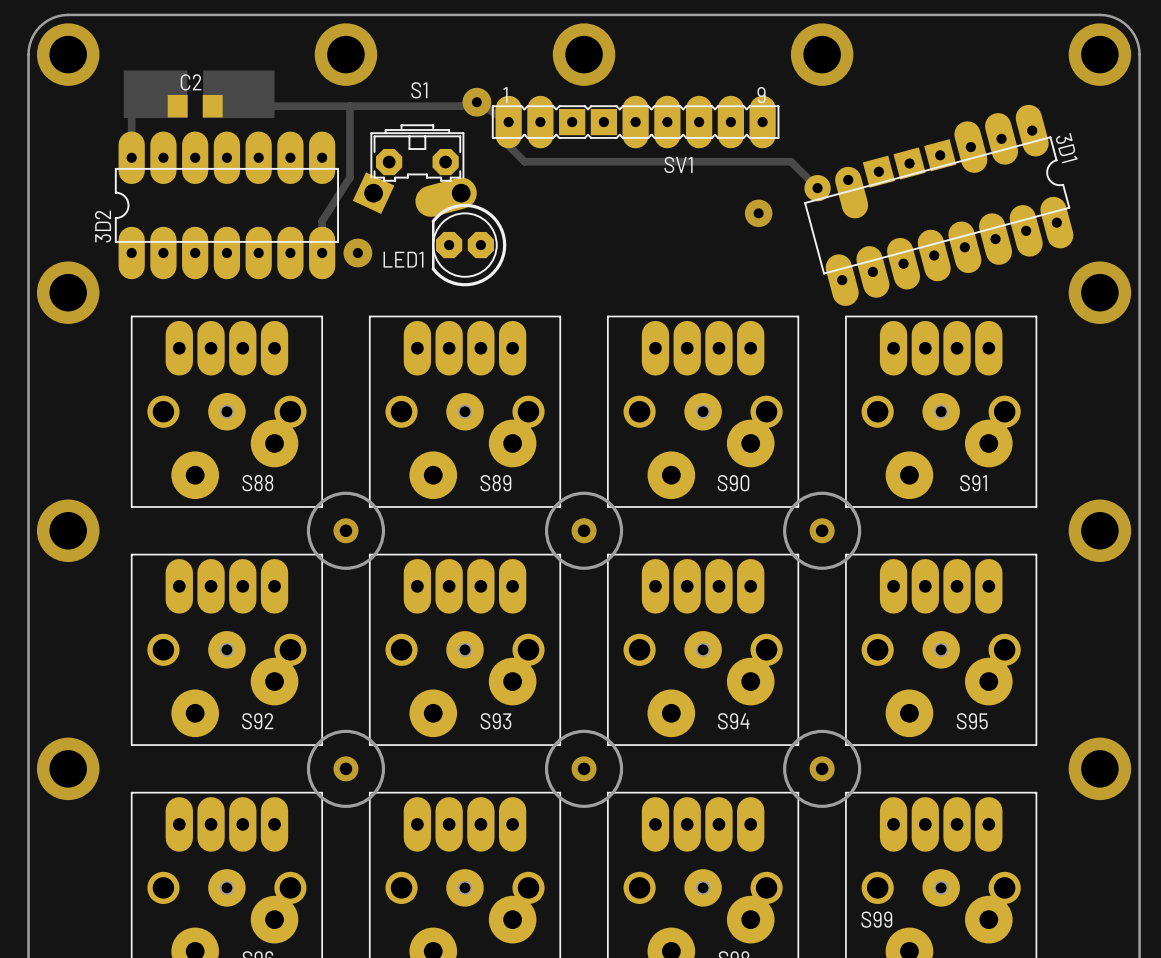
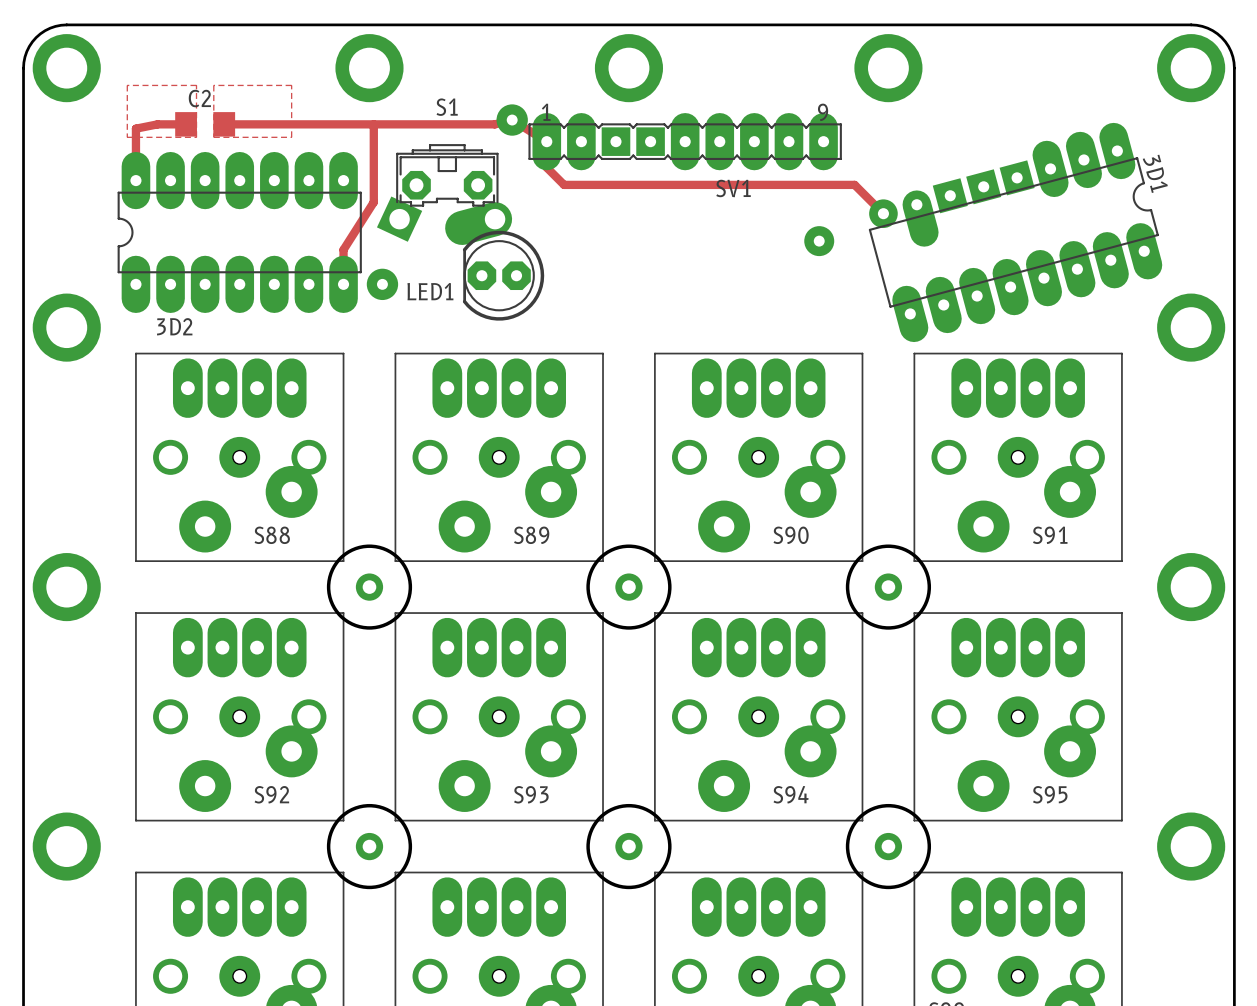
zone outline: none -> (127, 85) (196, 85) (196, 137) (127, 137) (127, 85)
drawing: [123, 70, 188, 119] -> none
zone outline: none -> (213, 85) (291, 85) (291, 137) (213, 137) (213, 85)
drawing: [203, 70, 275, 119] -> none
3D2 name rotation: 0° (103, 226) -> 90° clockwise (174, 326)
3D2 name position: 3D2 (103, 226) -> 3D2 (174, 326)

